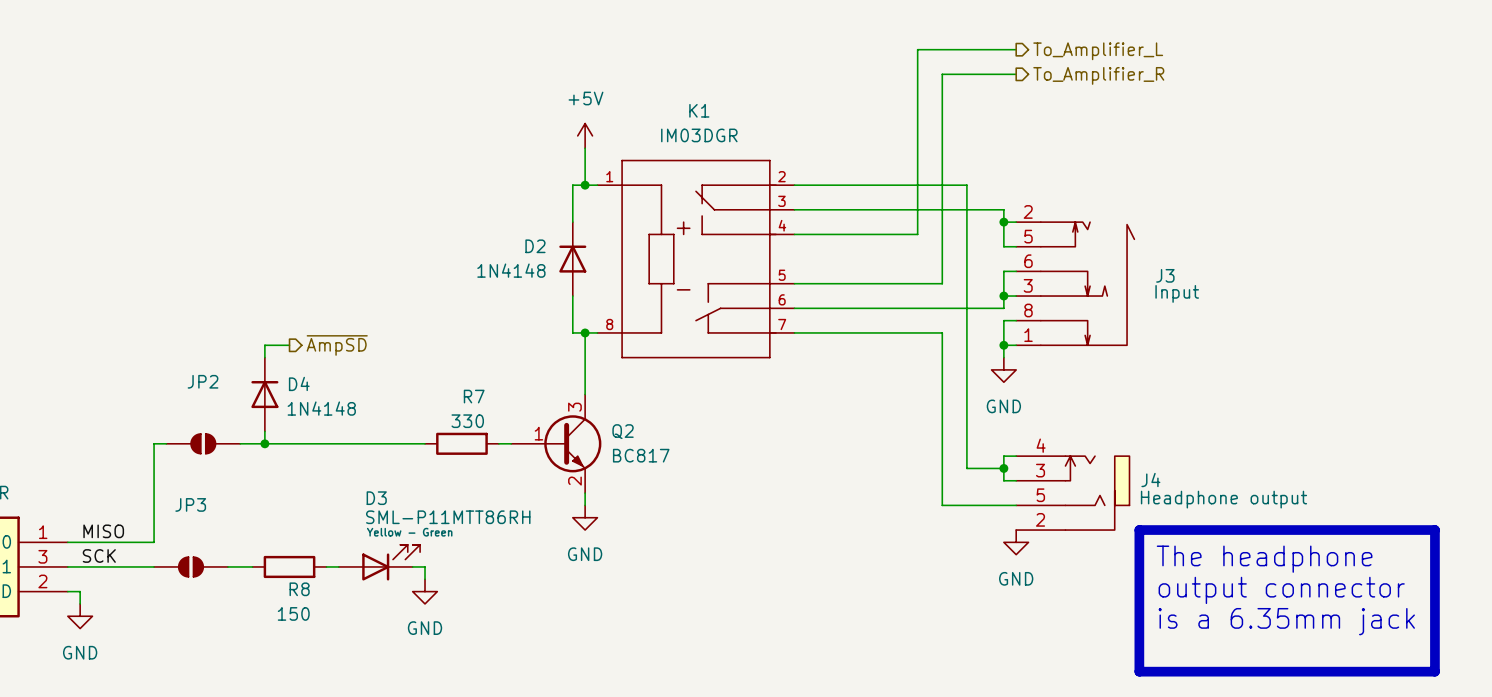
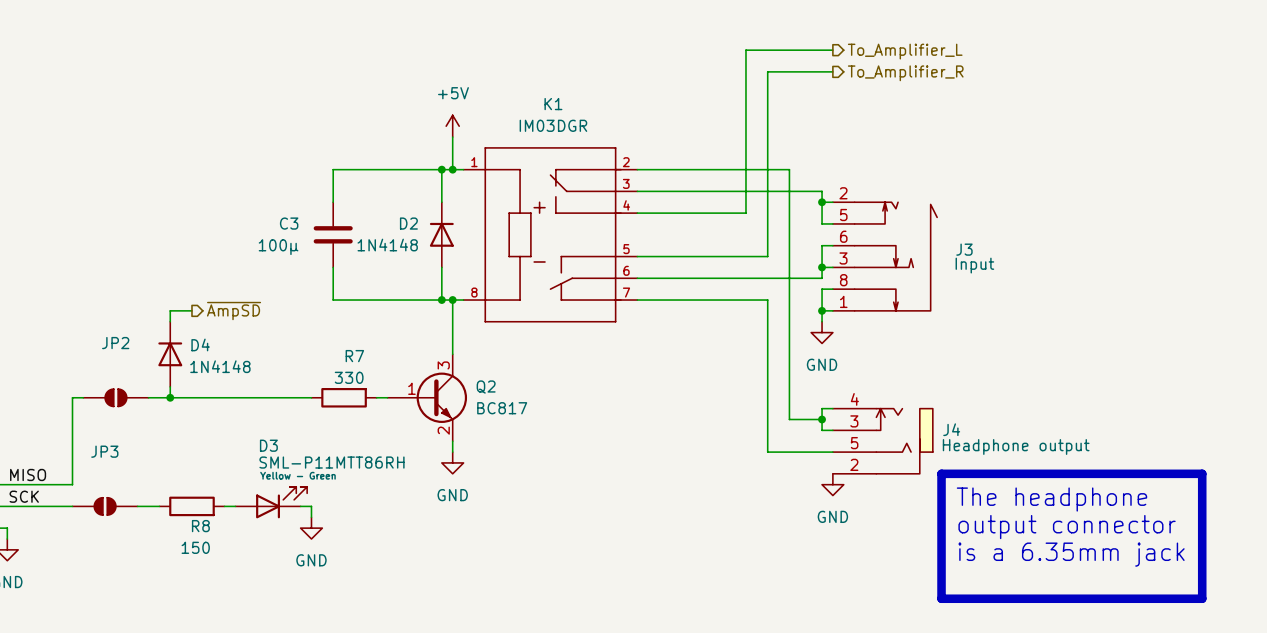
wire: none -> (441, 169) (333, 169) (333, 202)
junction: none -> (441, 169)
C3: none -> 100µ (333, 234)
wire: none -> (333, 267) (333, 300) (441, 300)
junction: none -> (441, 300)

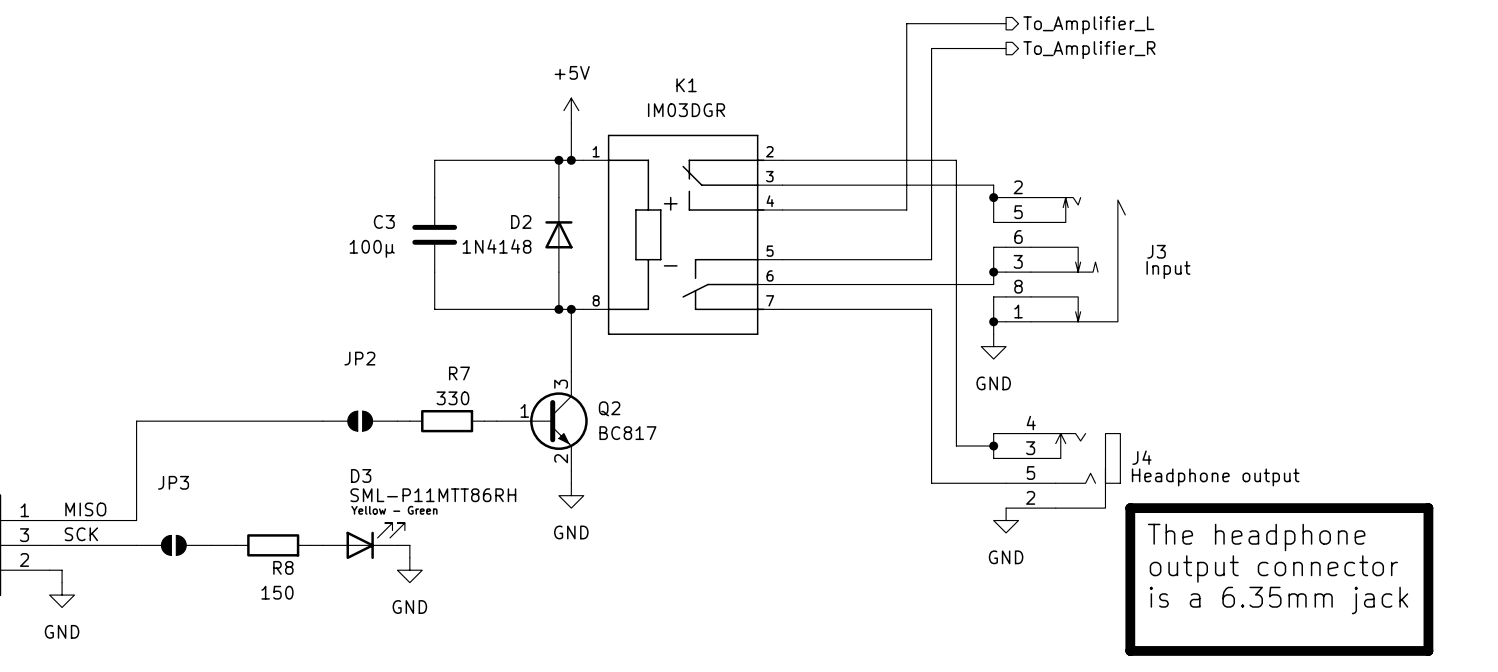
wire: (191, 310) (170, 310) (170, 321) -> none
hierarchical label: ~{AmpSD} (234, 311) -> none
D4: 1N4148 (170, 354) -> none
wire: (170, 386) (170, 397) -> none
JP2 position: (115, 397) -> (360, 421)
junction: (170, 397) -> none

